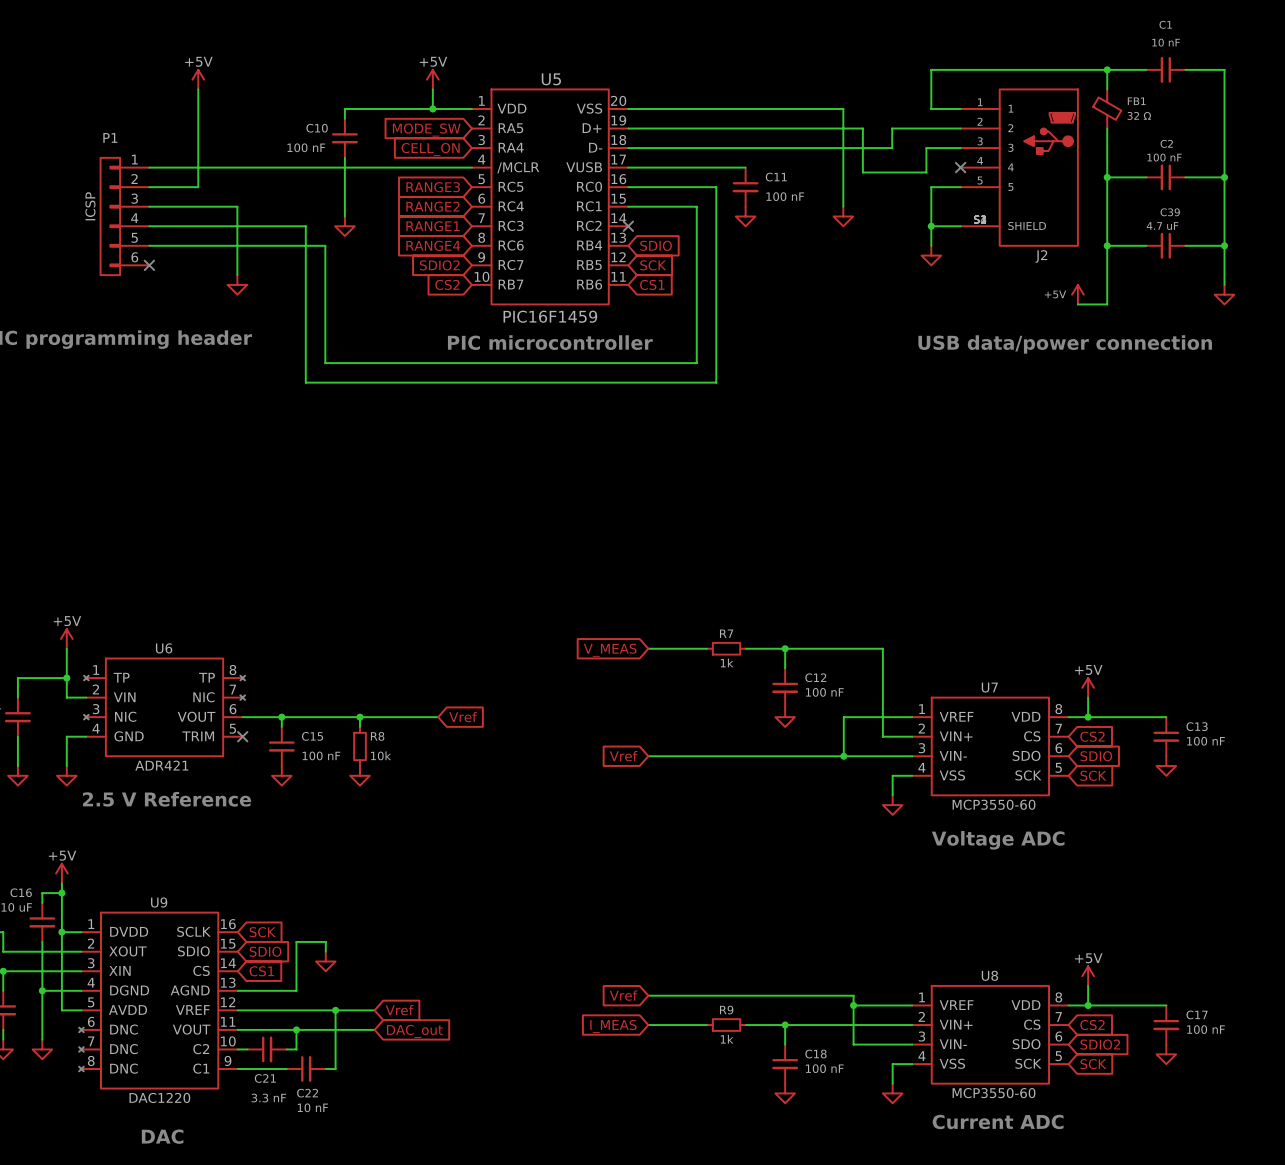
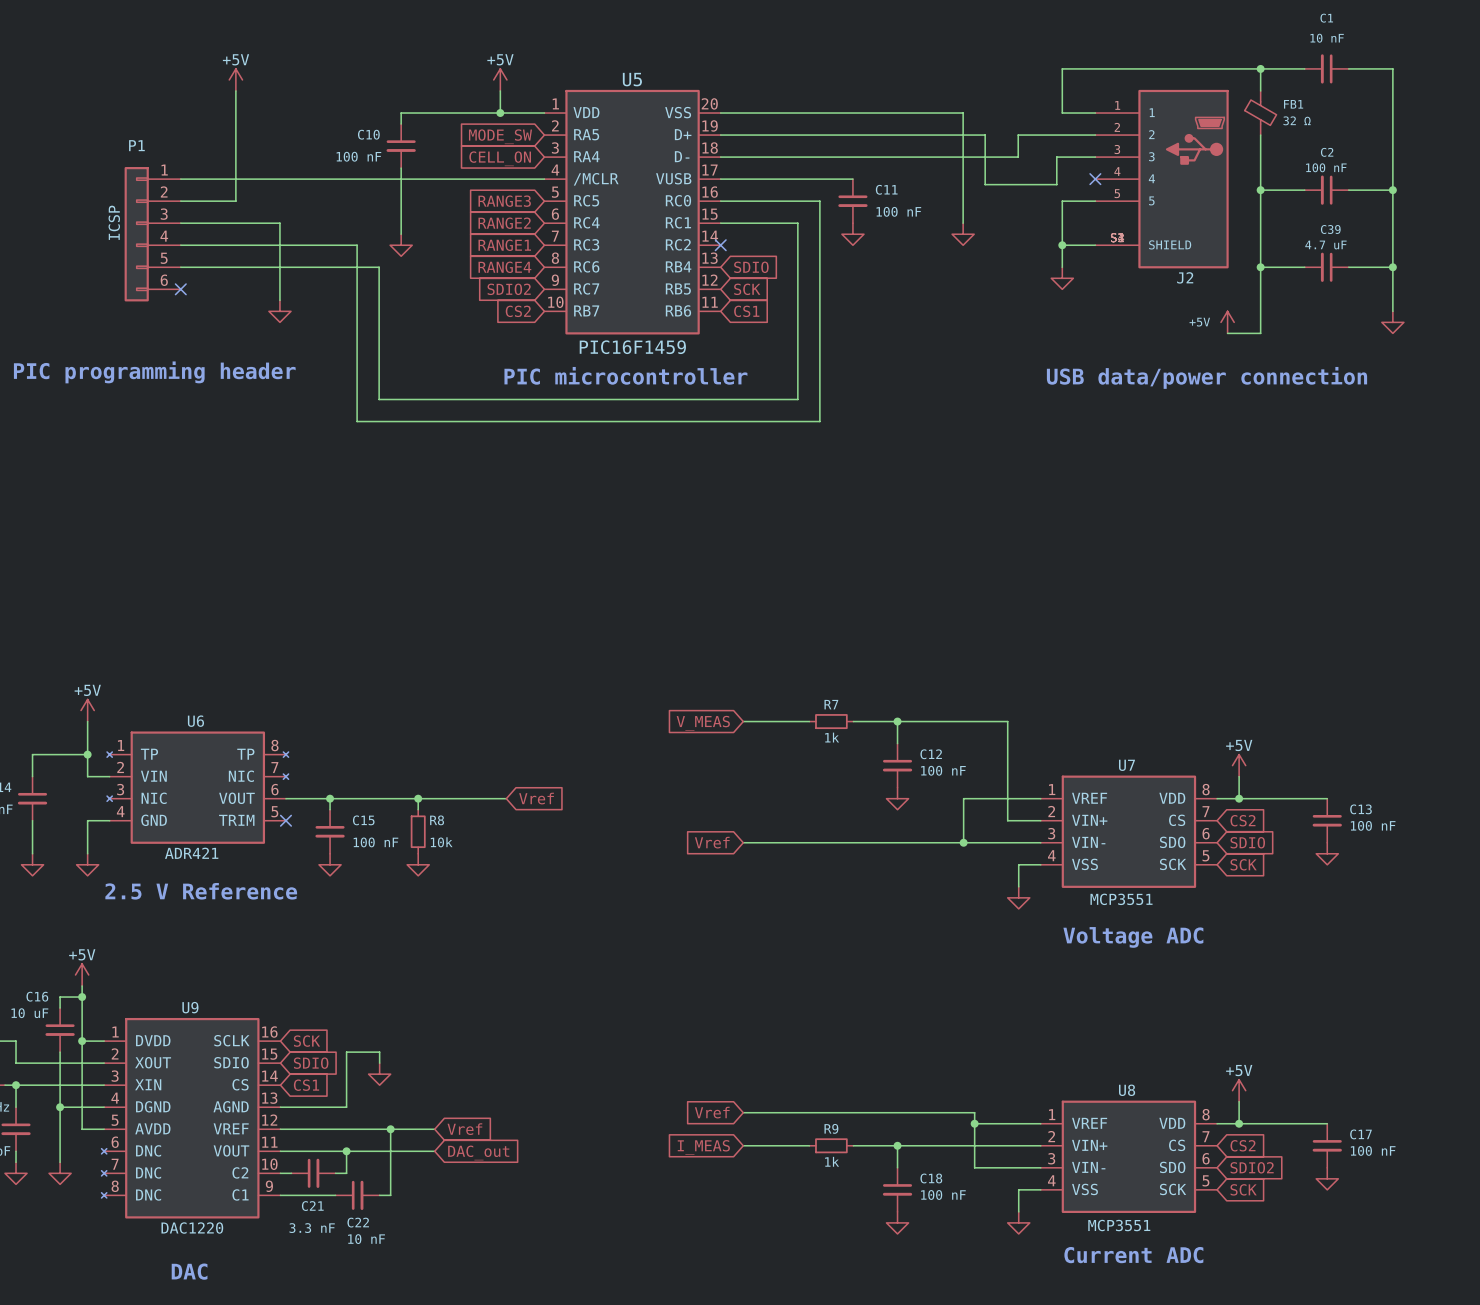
U7 value: MCP3550-60 (994, 804) -> MCP3551 (1121, 899)
U8 value: MCP3550-60 (994, 1093) -> MCP3551 (1119, 1225)

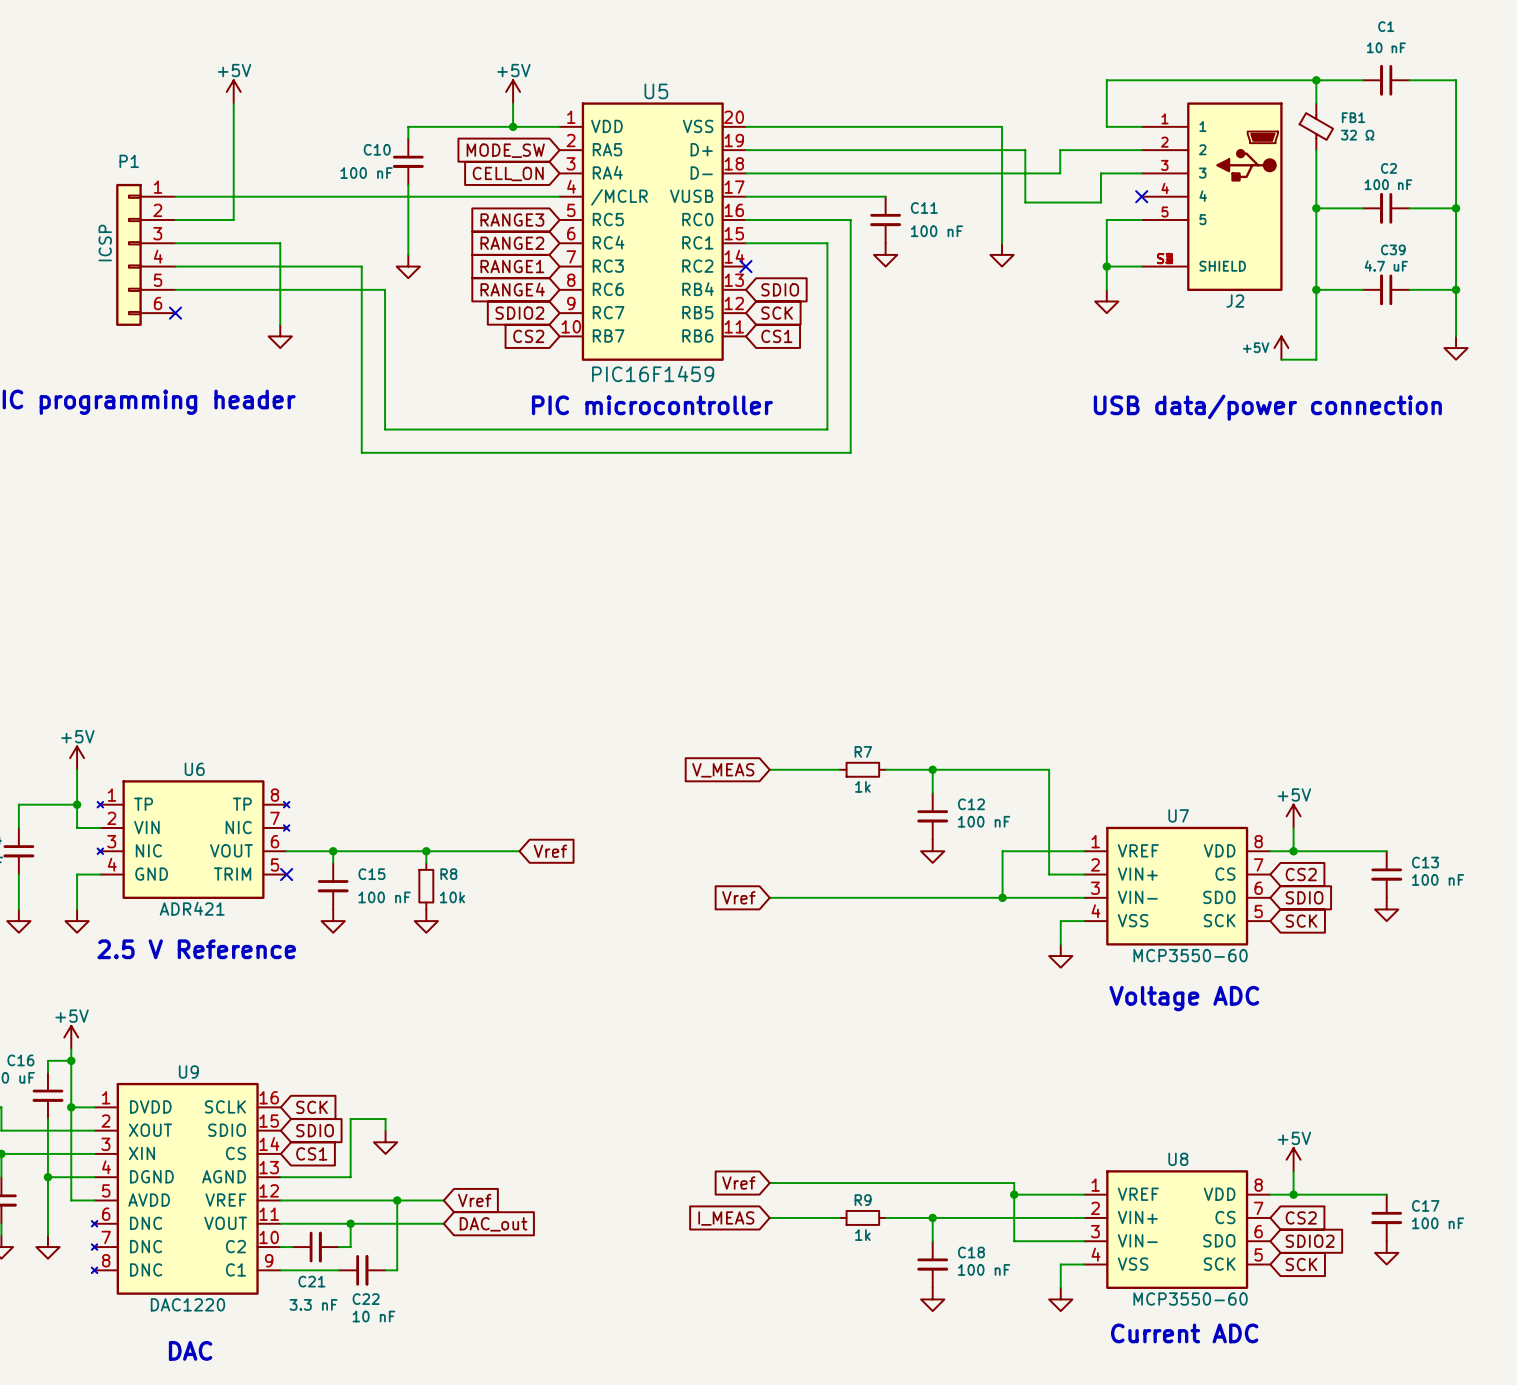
U7 value: MCP3551 (1121, 899) -> MCP3550-60 (1190, 955)
U8 value: MCP3551 (1119, 1225) -> MCP3550-60 (1190, 1299)

